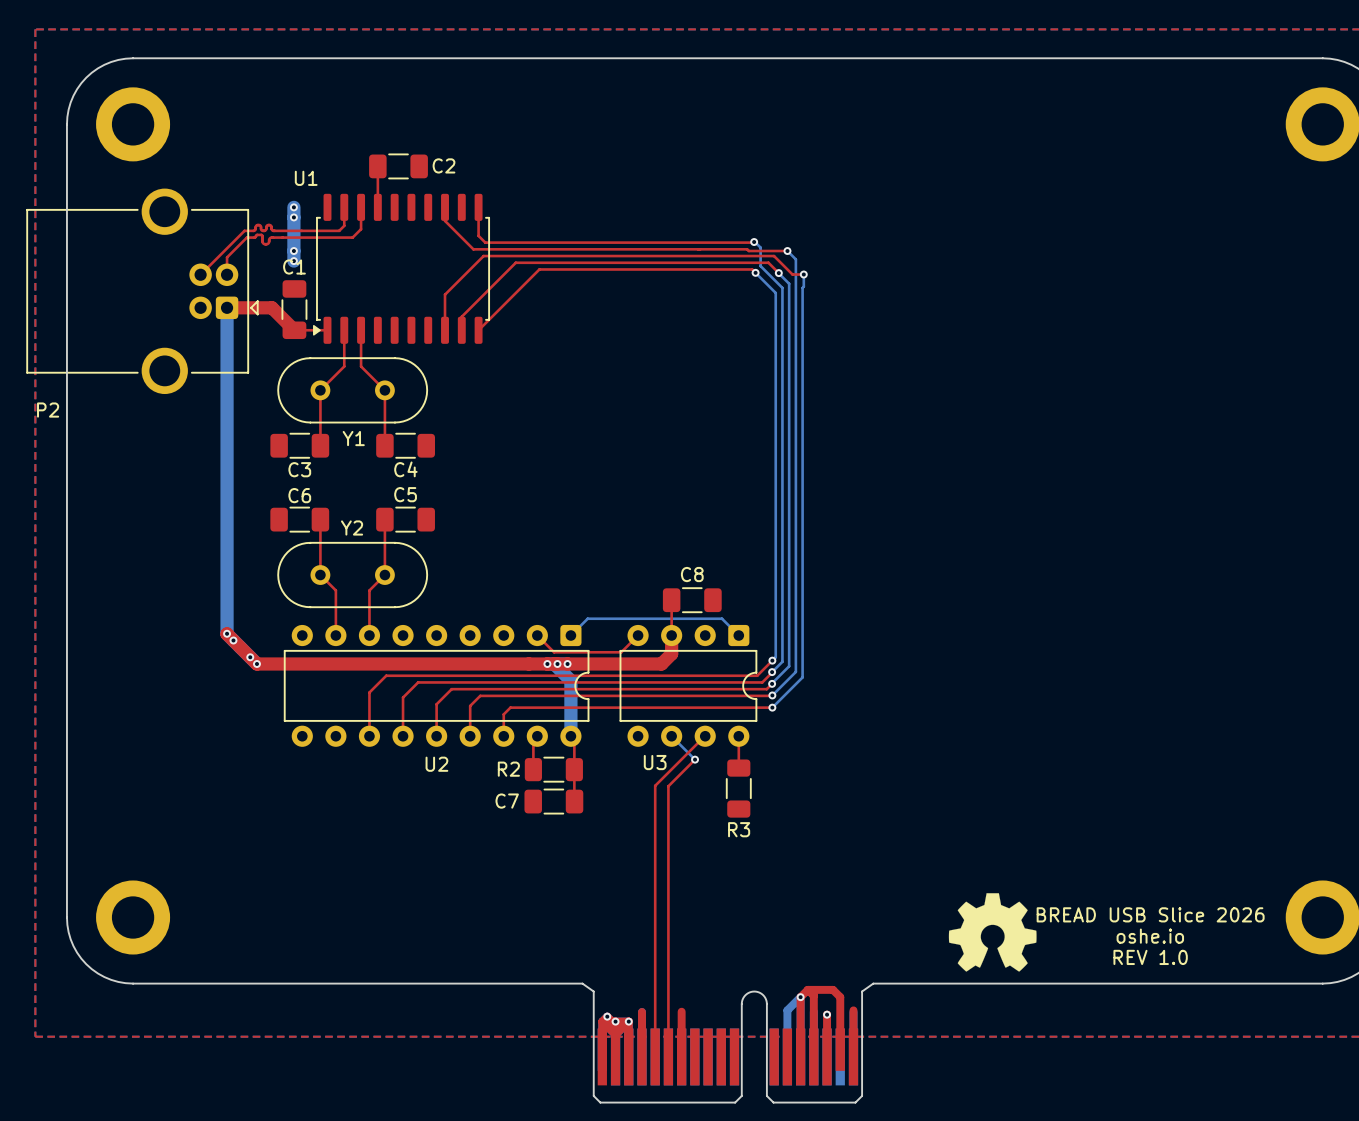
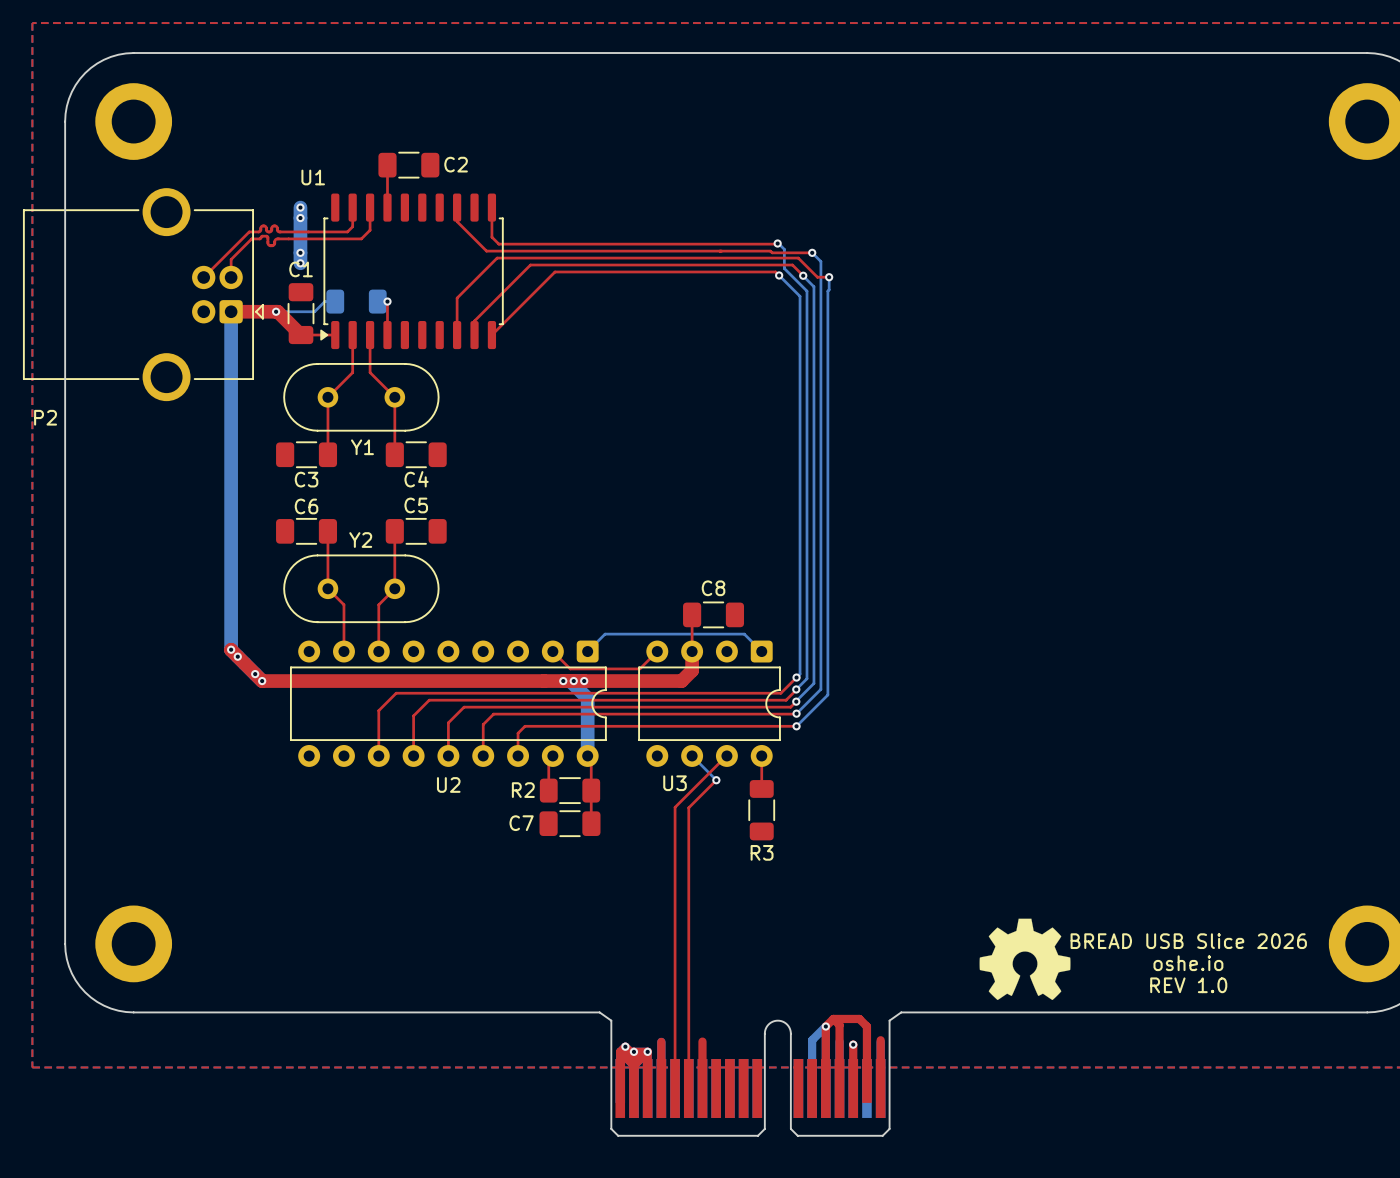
bottom track: none -> (335, 301) (324, 301) (314, 311) (276, 311)
part: none -> (356, 301)
top track: none -> (387, 301) (387, 335)
via: none -> (387, 301)
via: none -> (276, 311)

